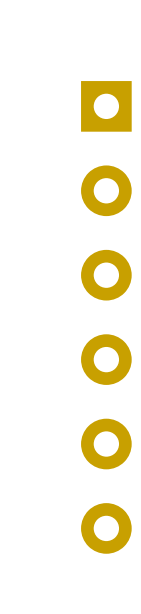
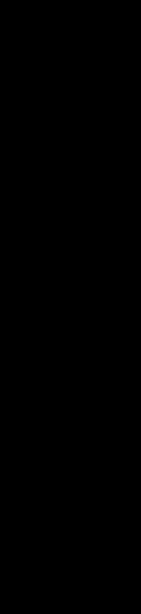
part: (106, 317) -> none

